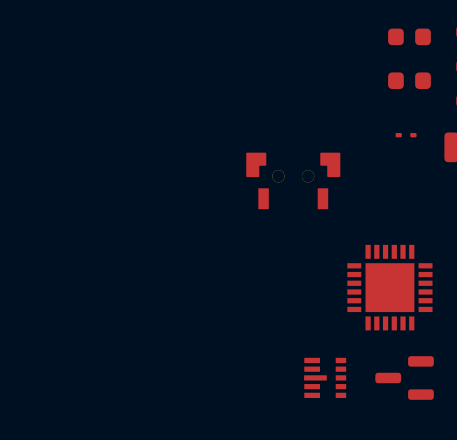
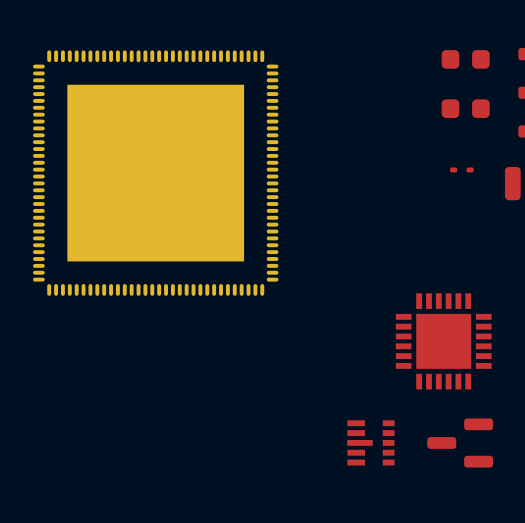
part: none -> (155, 173)
part: (293, 180) -> none

